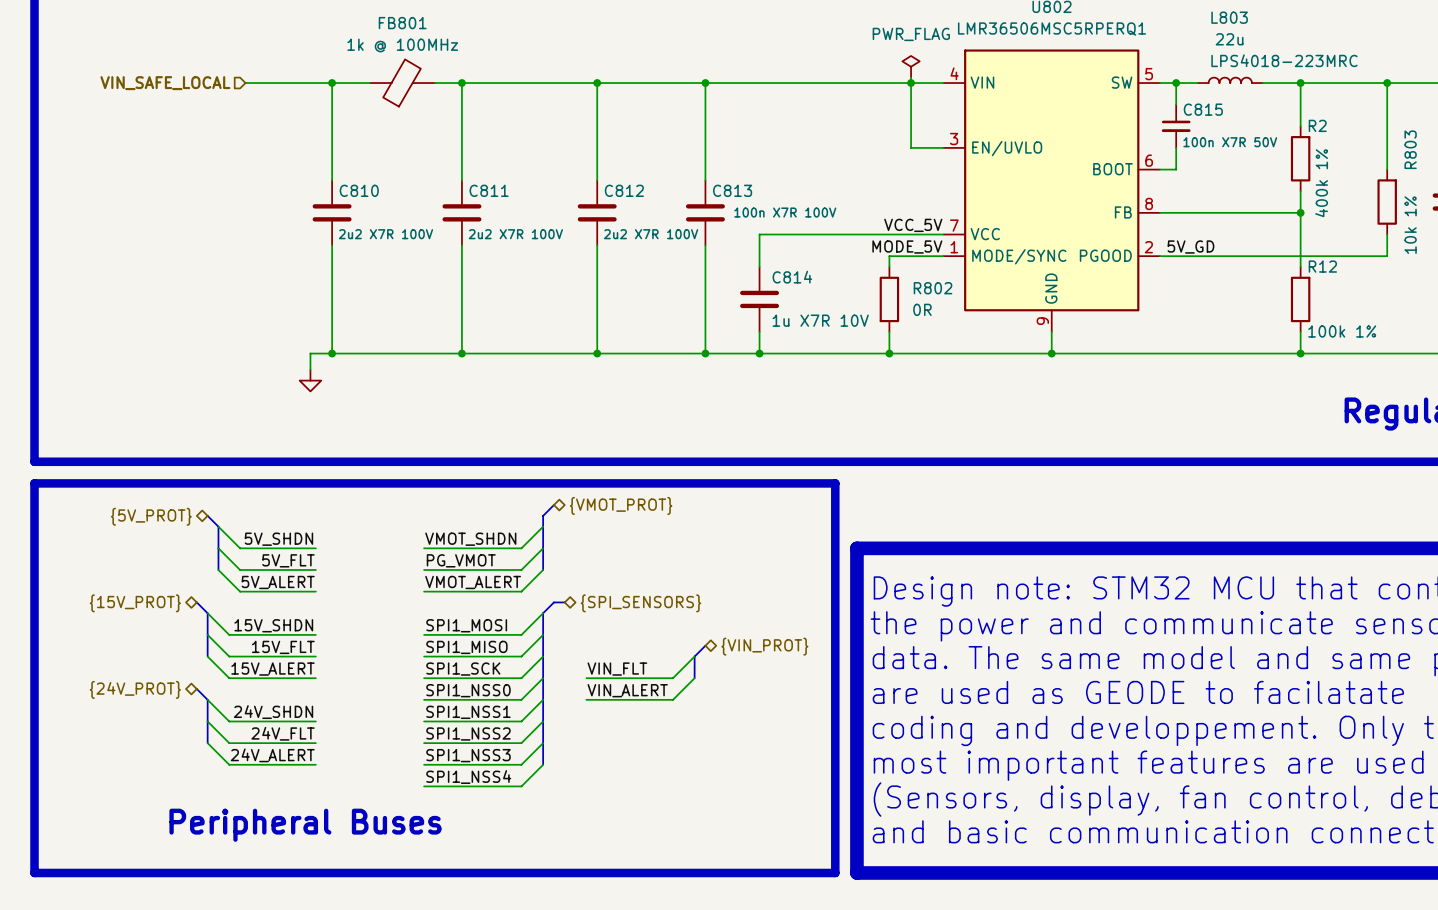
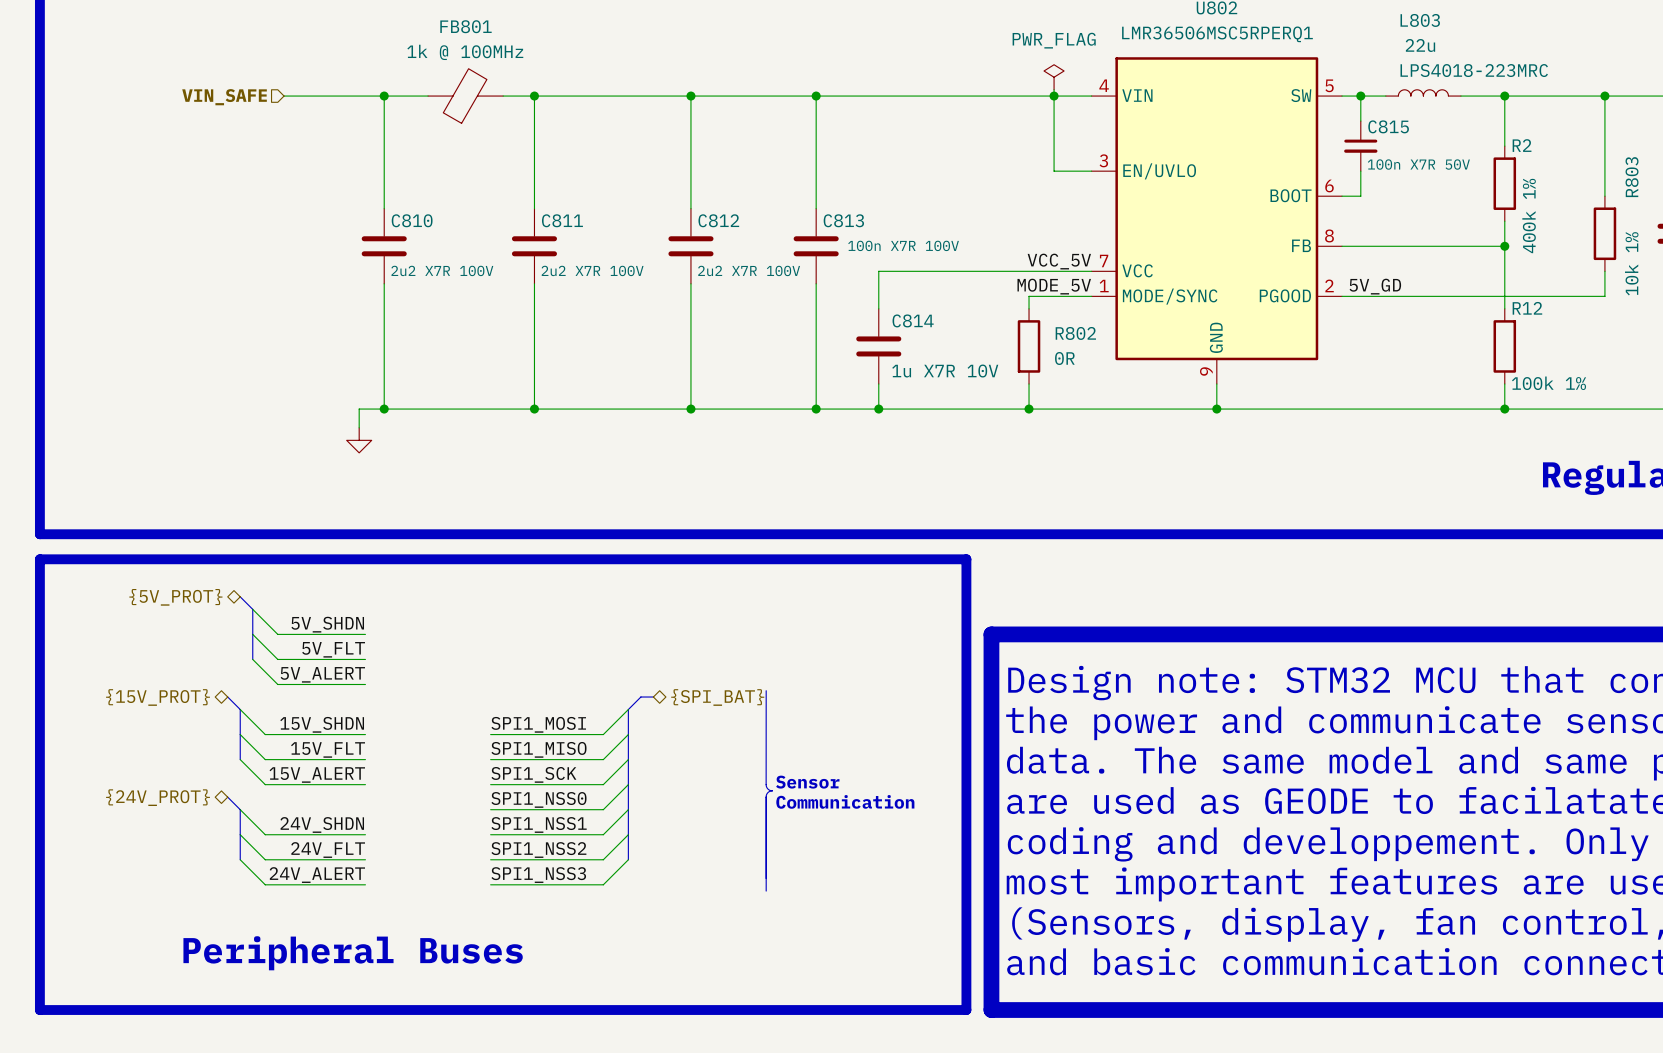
hierarchical label: VIN_SAFE_LOCAL (165, 83) -> VIN_SAFE (224, 97)
bus: (553, 505) (543, 515) (543, 569) -> none
hierarchical label: {VMOT_PROT} (621, 505) -> none
wire: (543, 526) (521, 548) (424, 548) -> none
label: VMOT_SHDN (470, 539) -> none
wire: (543, 548) (521, 569) (424, 569) -> none
label: PG_VMOT (461, 560) -> none
wire: (543, 569) (521, 591) (424, 591) -> none
label: VMOT_ALERT (473, 582) -> none
line: none -> (766, 690) (766, 785) (768, 789) (772, 790) (767, 792) (766, 797)
hierarchical label: {SPI_SENSORS} (640, 603) -> {SPI_BAT} (717, 697)
bus: (705, 645) (694, 656) (694, 678) -> none
hierarchical label: {VIN_PROT} (764, 646) -> none
wire: (694, 656) (672, 678) (586, 678) -> none
label: VIN_FLT (617, 669) -> none
text: none -> Sensor (807, 782)
wire: (694, 678) (672, 699) (586, 699) -> none
line: none -> (766, 797) (766, 891)
label: VIN_ALERT (627, 690) -> none
text: none -> Communication (845, 801)
bus: (543, 743) (543, 764) -> none
wire: (543, 764) (521, 786) (424, 786) -> none
label: SPI1_NSS4 (468, 777) -> none

